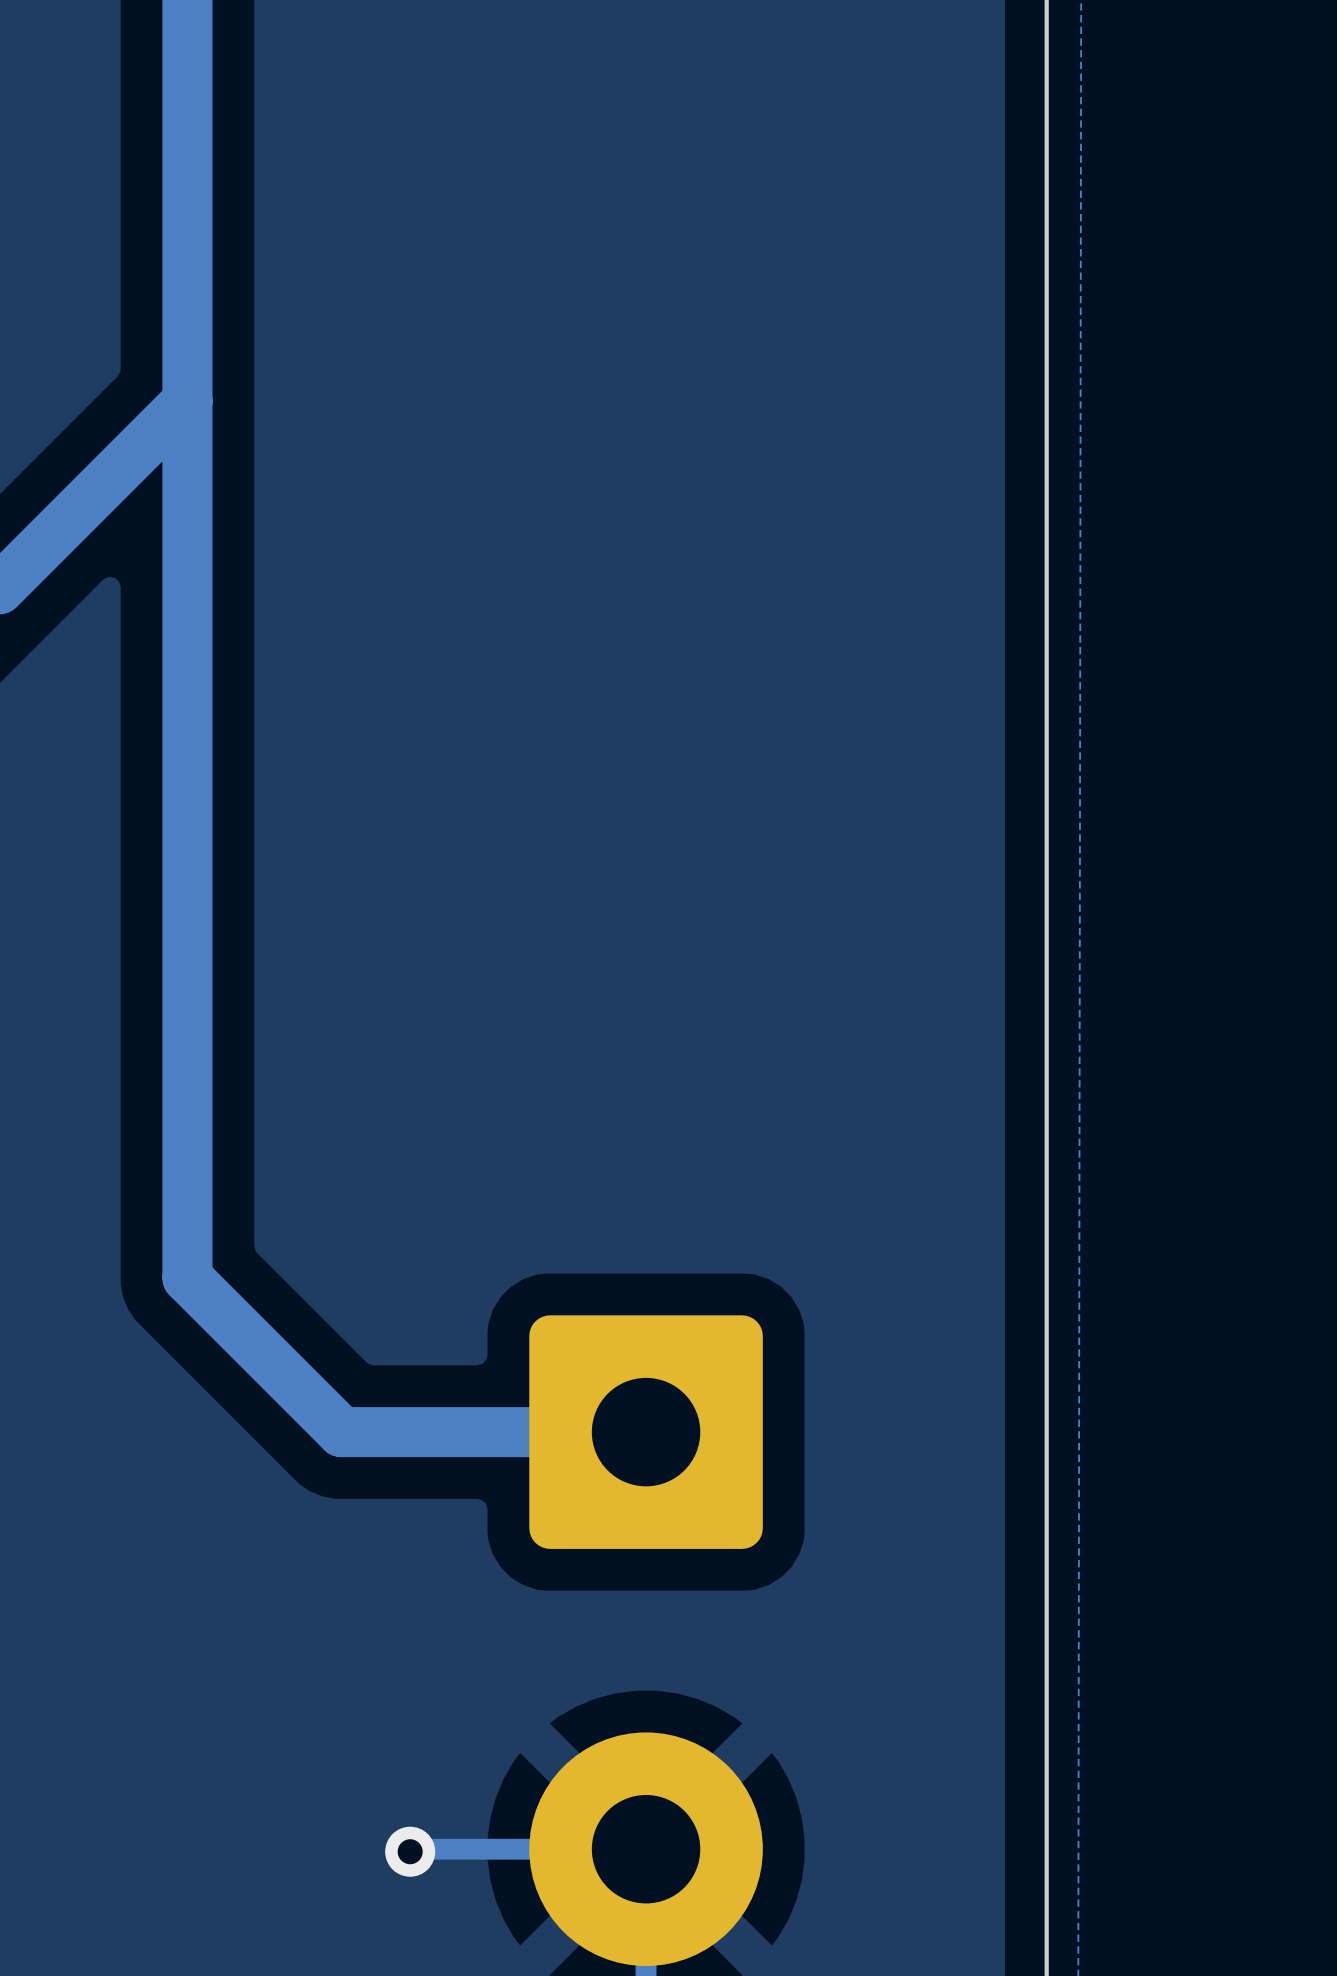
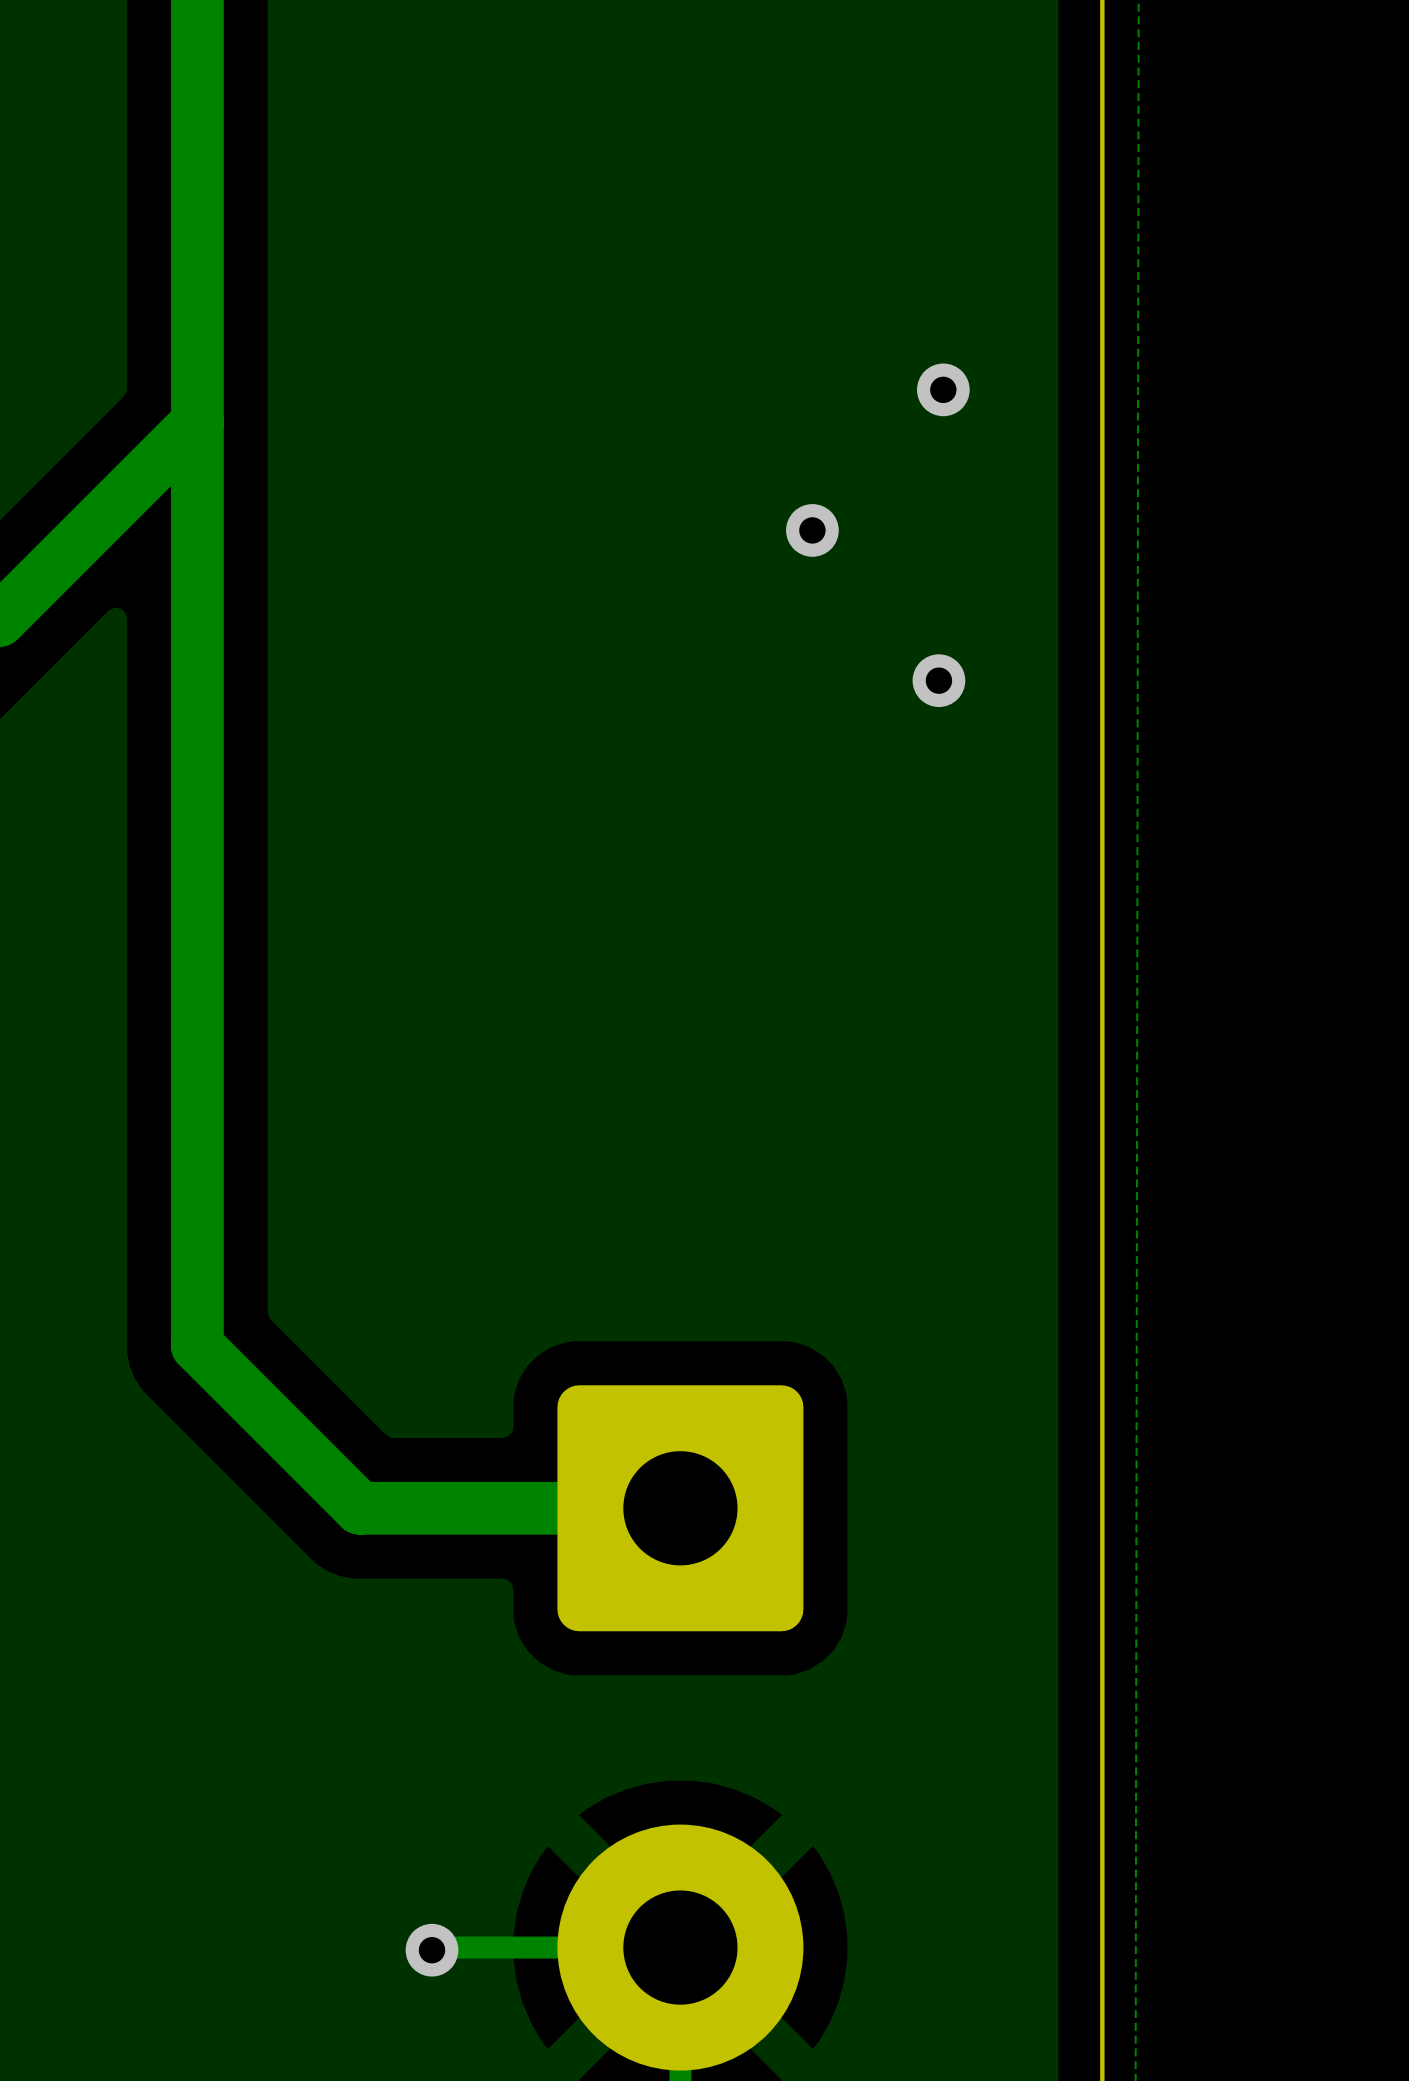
via: none -> (943, 389)
via: none -> (812, 530)
via: none -> (938, 680)

